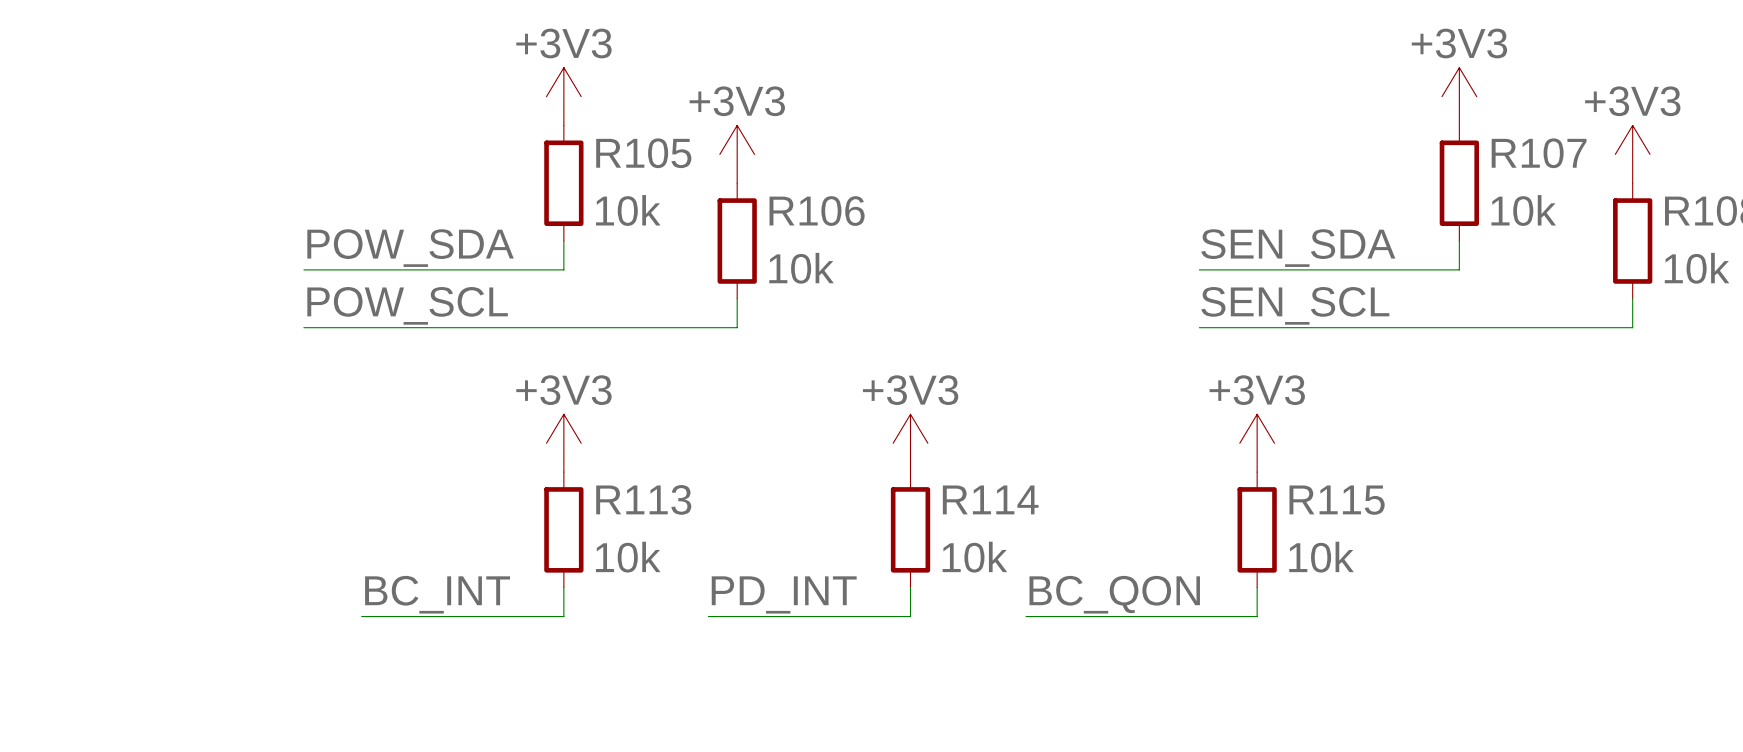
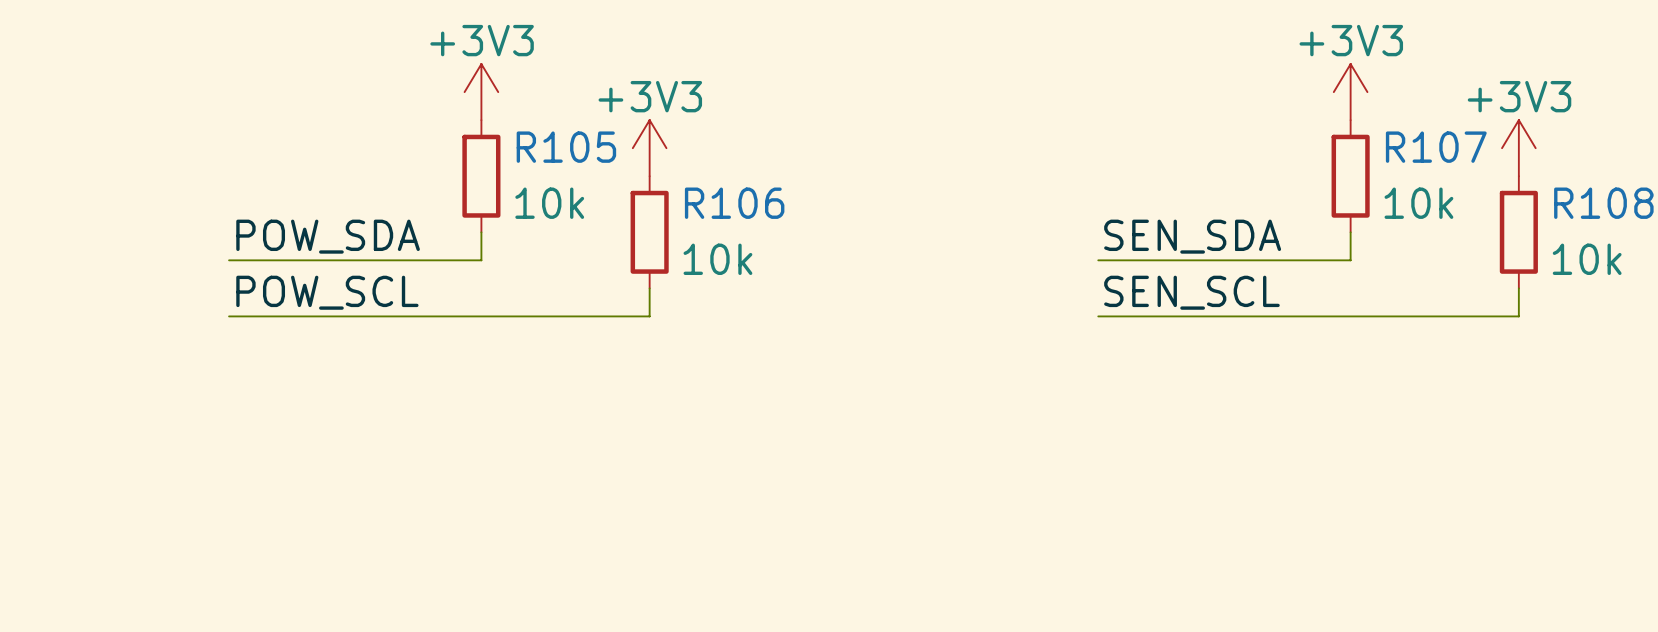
power symbol: +3V3 (563, 443) -> none
power symbol: +3V3 (910, 443) -> none
power symbol: +3V3 (1257, 443) -> none
R113: 10k (563, 529) -> none
R114: 10k (910, 529) -> none
R115: 10k (1257, 529) -> none
wire: (563, 587) (563, 616) (361, 616) -> none
wire: (910, 587) (910, 616) (708, 616) -> none
wire: (1257, 587) (1257, 616) (1026, 616) -> none
label: BC_INT (437, 594) -> none
label: PD_INT (784, 594) -> none
label: BC_QON (1114, 594) -> none

